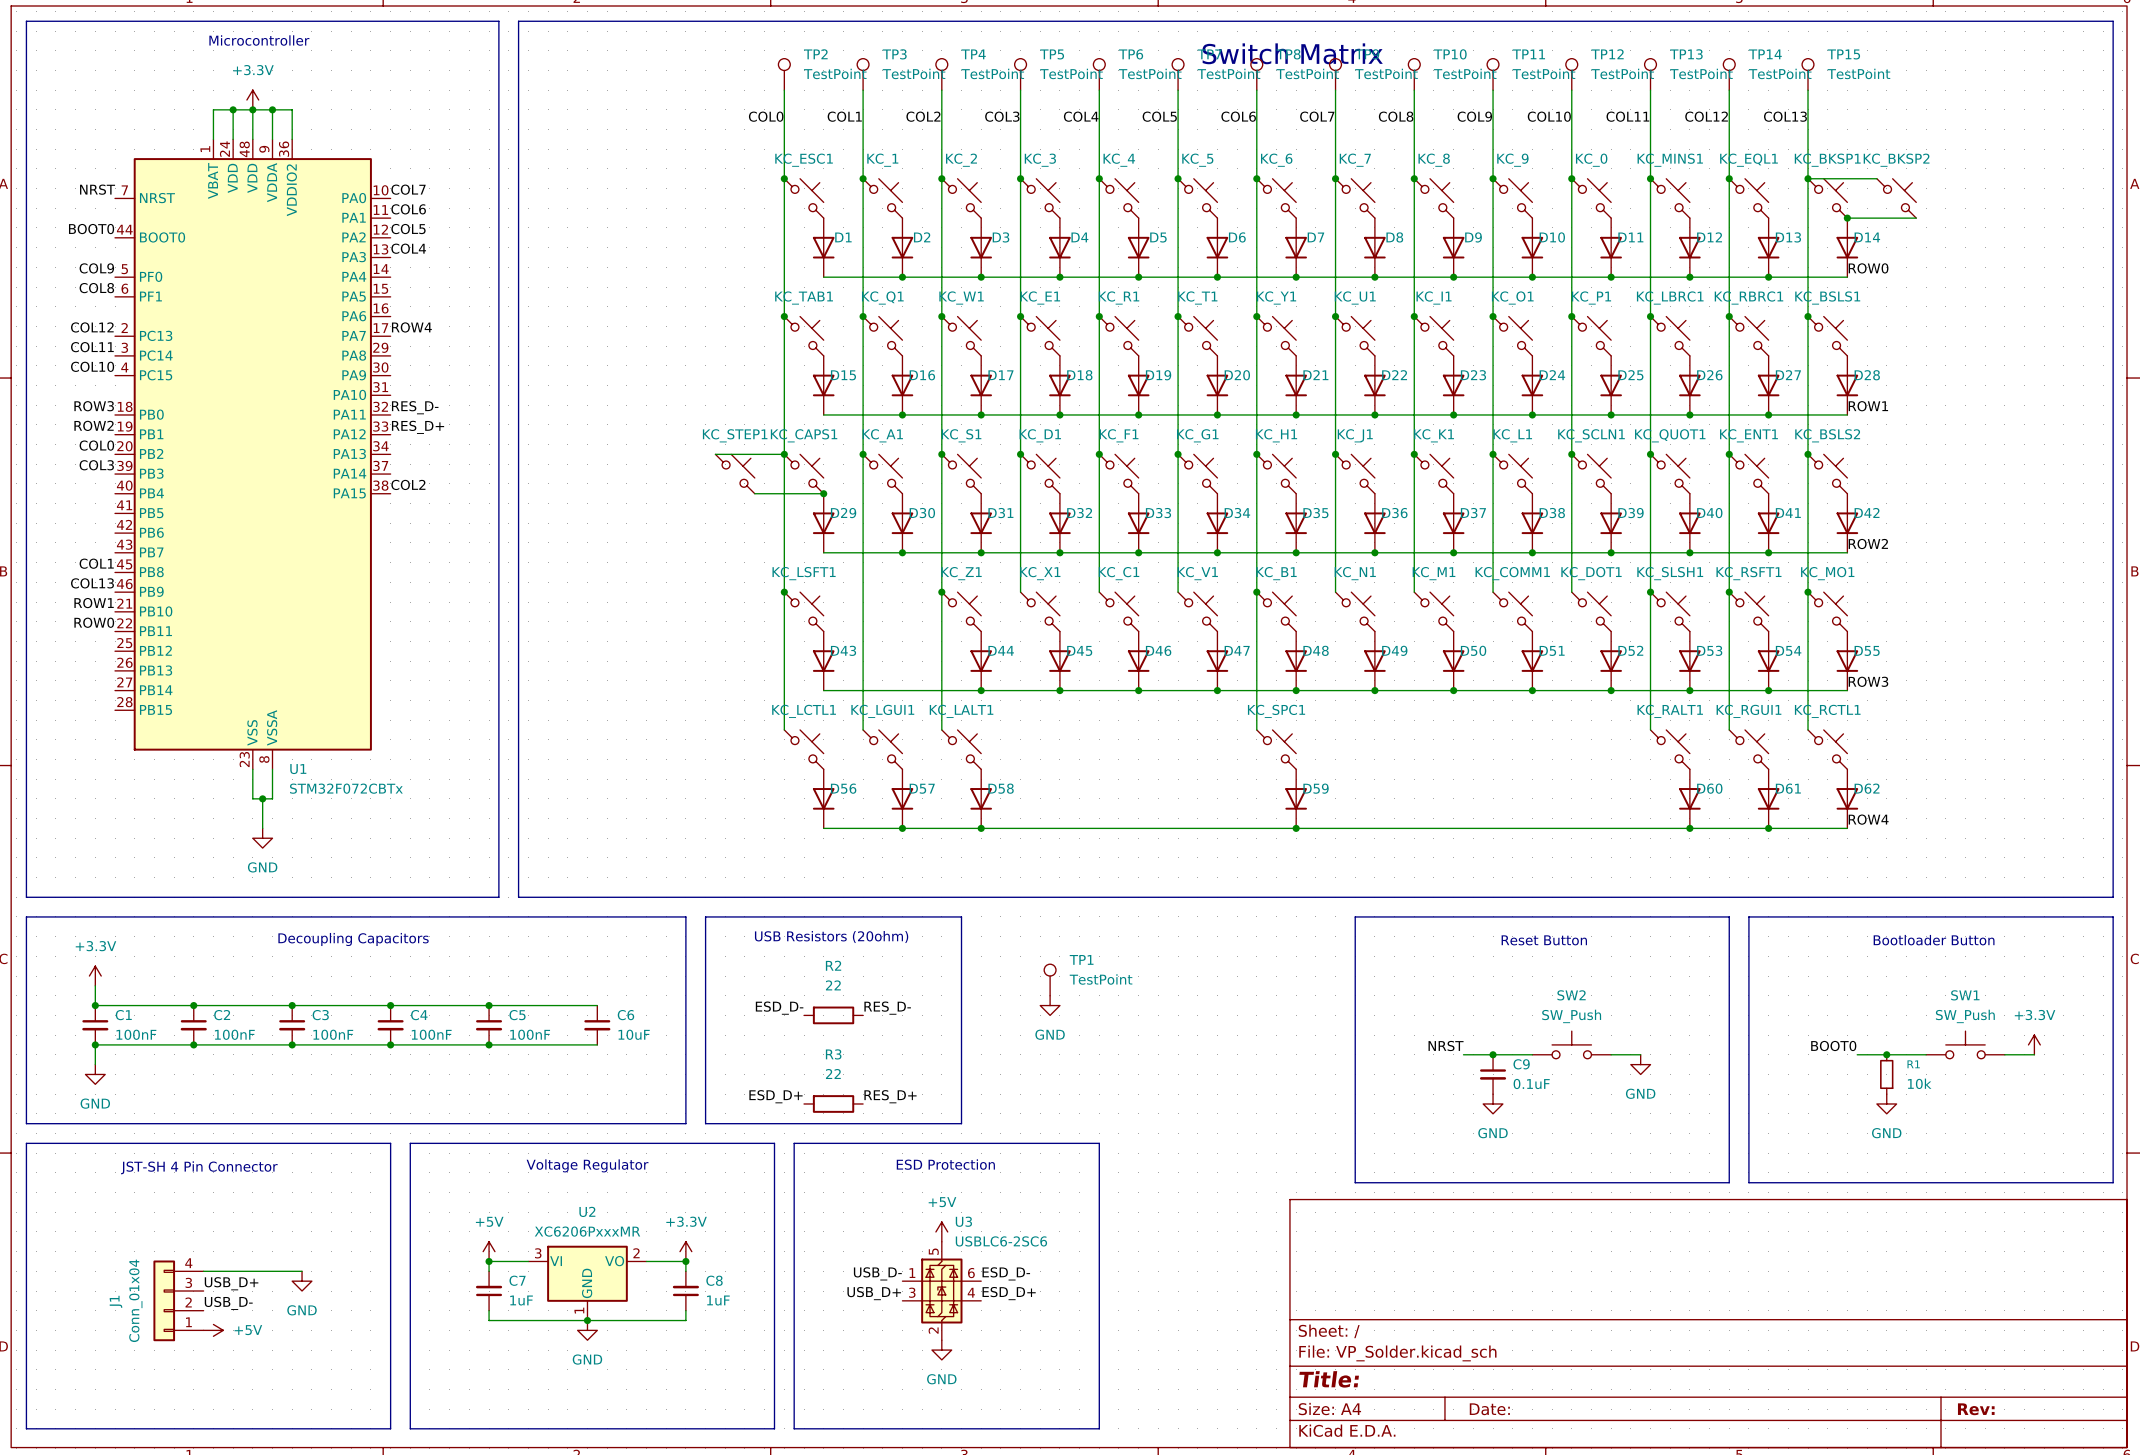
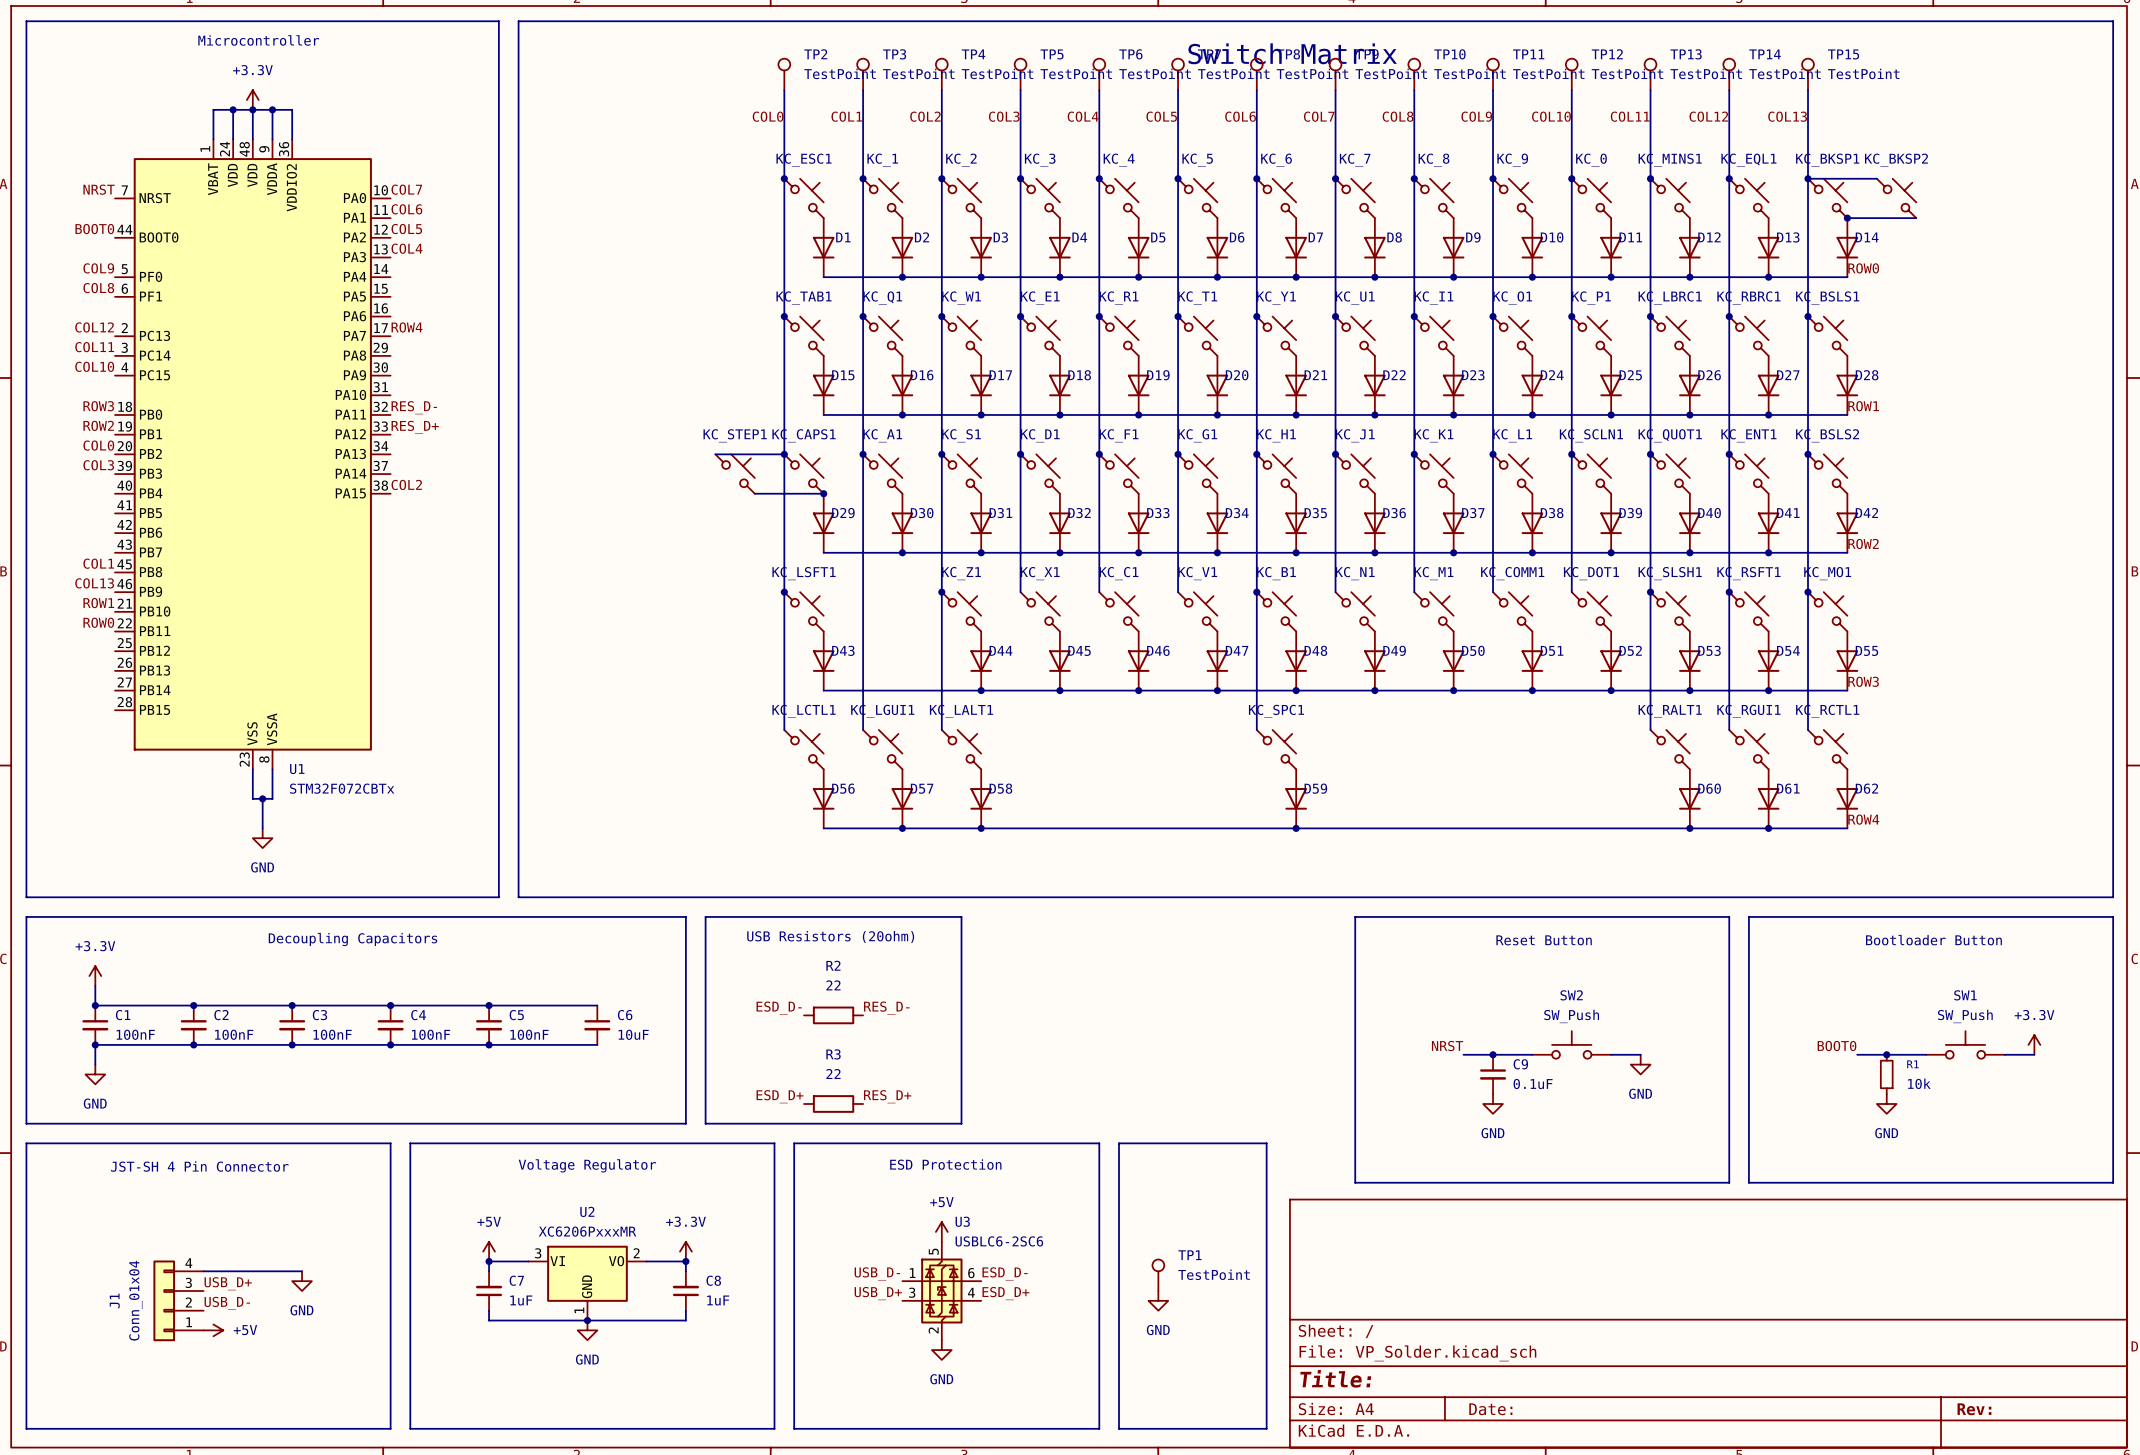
TP1 position: (1050, 979) -> (1158, 1275)
power symbol: GND (1050, 1005) -> none
line: none -> (1118, 1143) (1266, 1143) (1266, 1428) (1118, 1428) (1118, 1143)
power symbol: none -> GND (1158, 1300)

